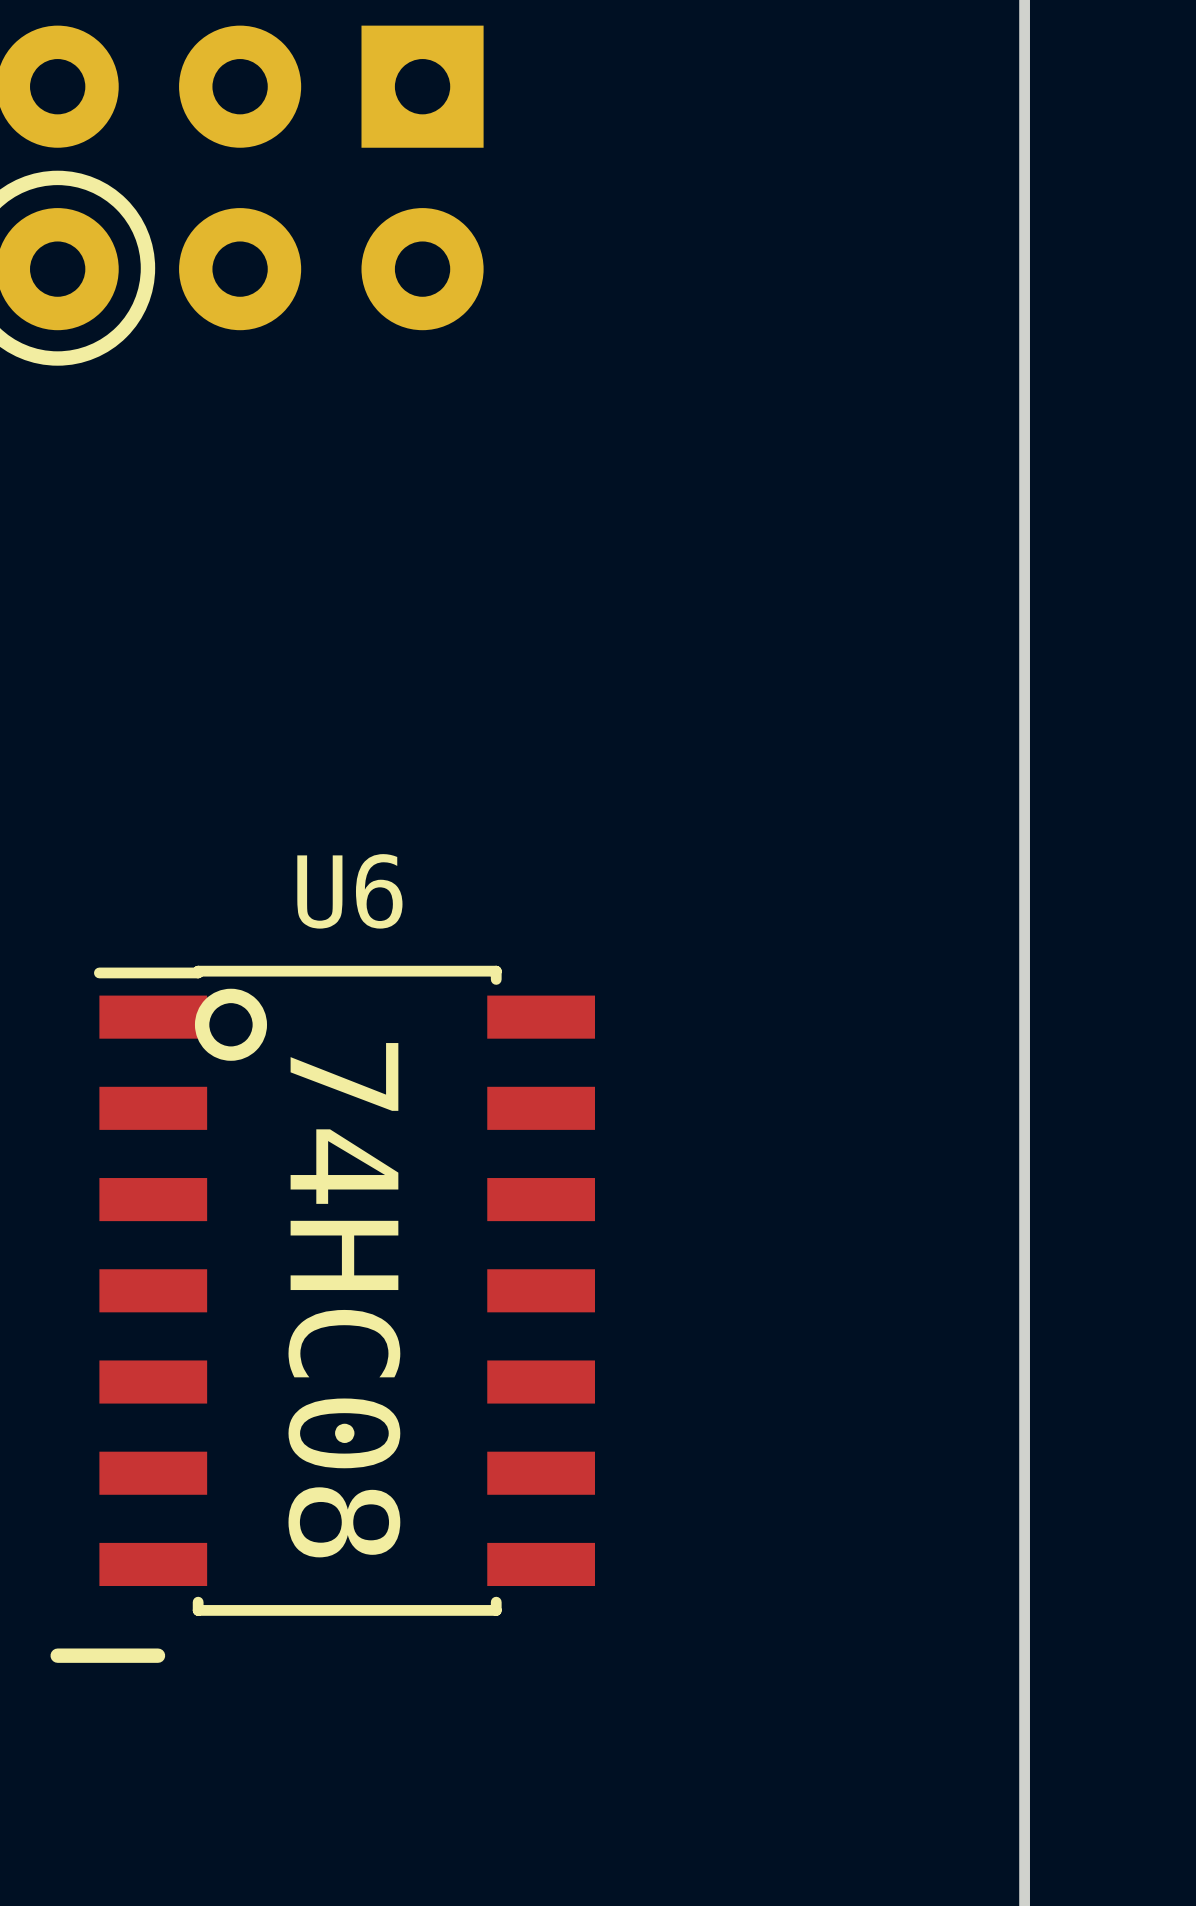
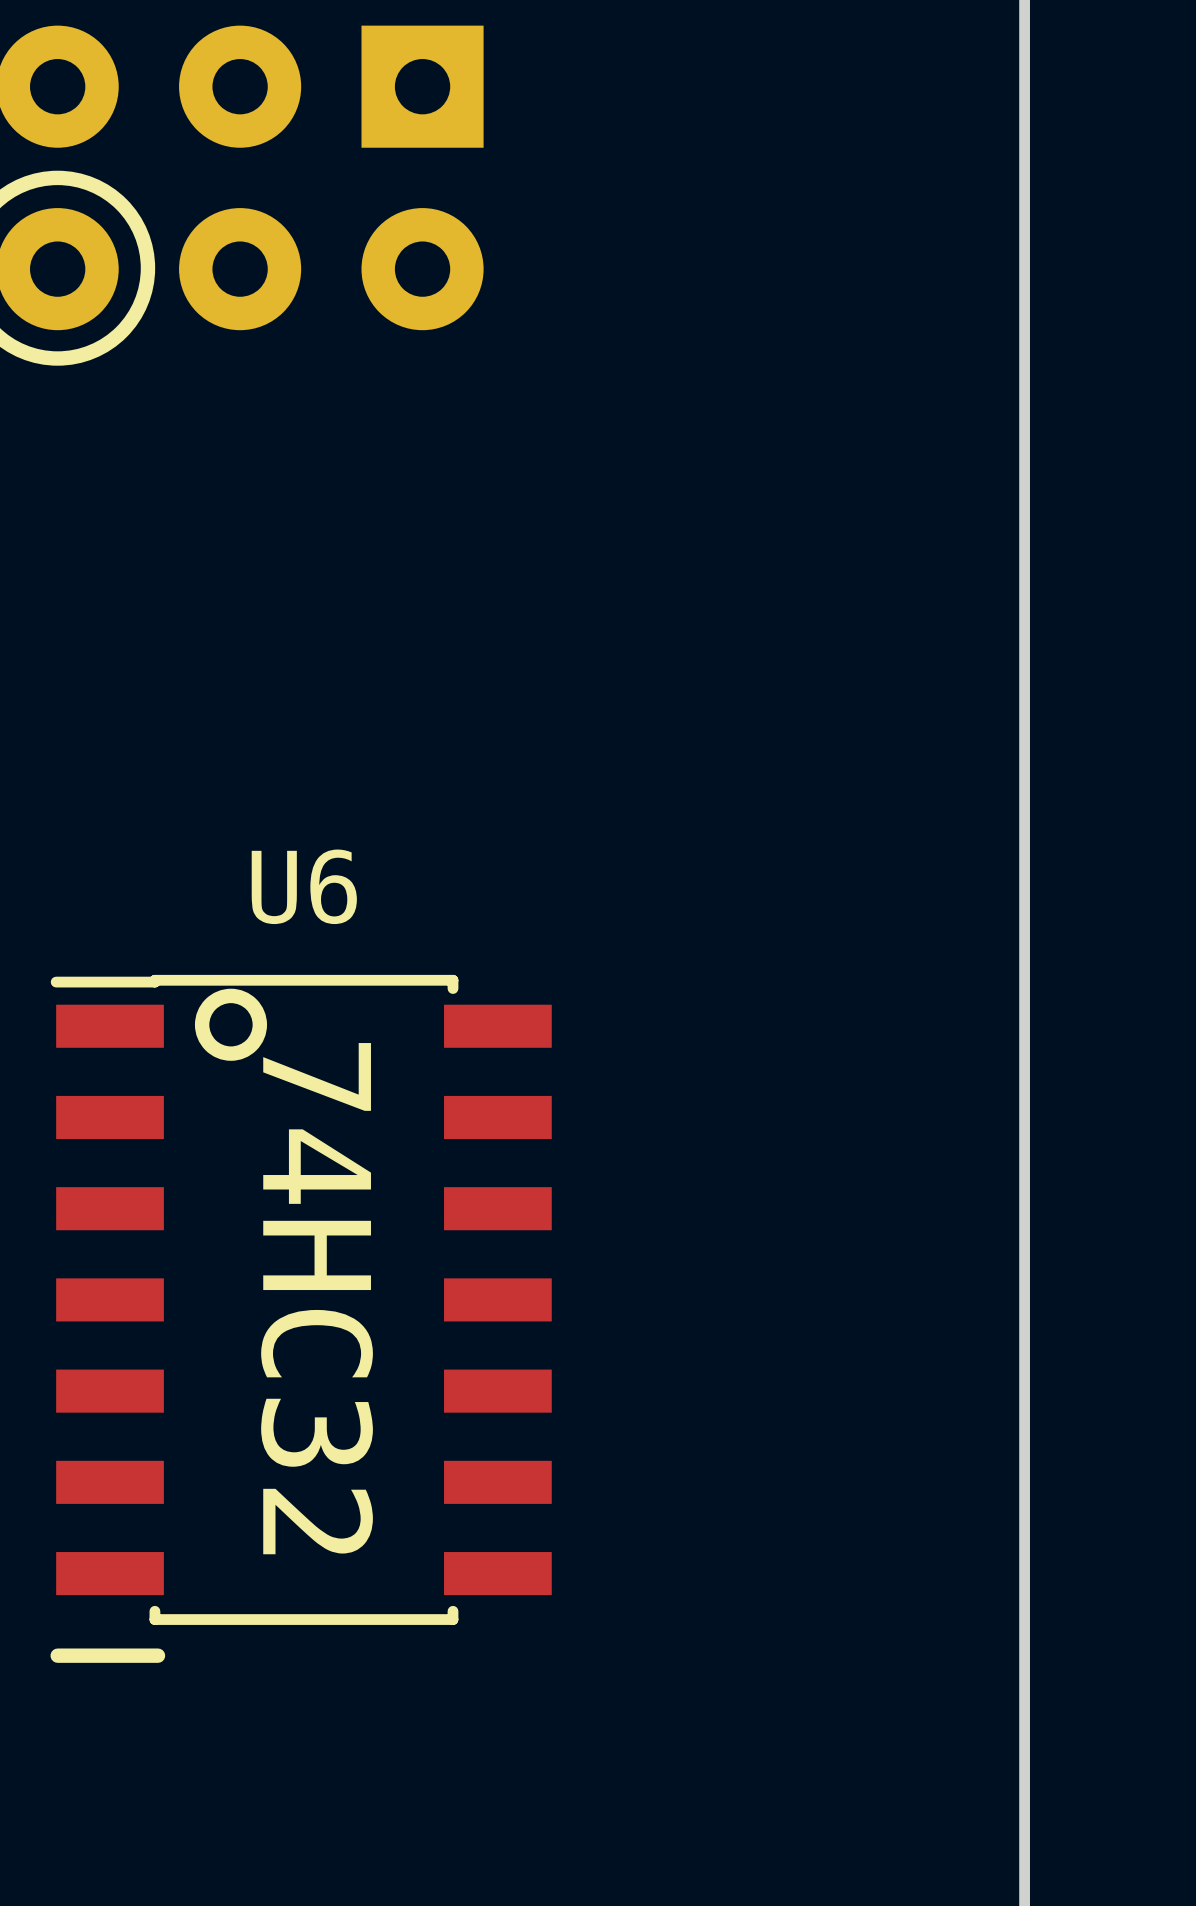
U6 name position: U6 (349, 891) -> U6 (304, 886)
U6 position: (344, 1290) -> (301, 1299)
text: 74HC08 (344, 1300) -> 74HC32 (317, 1298)

